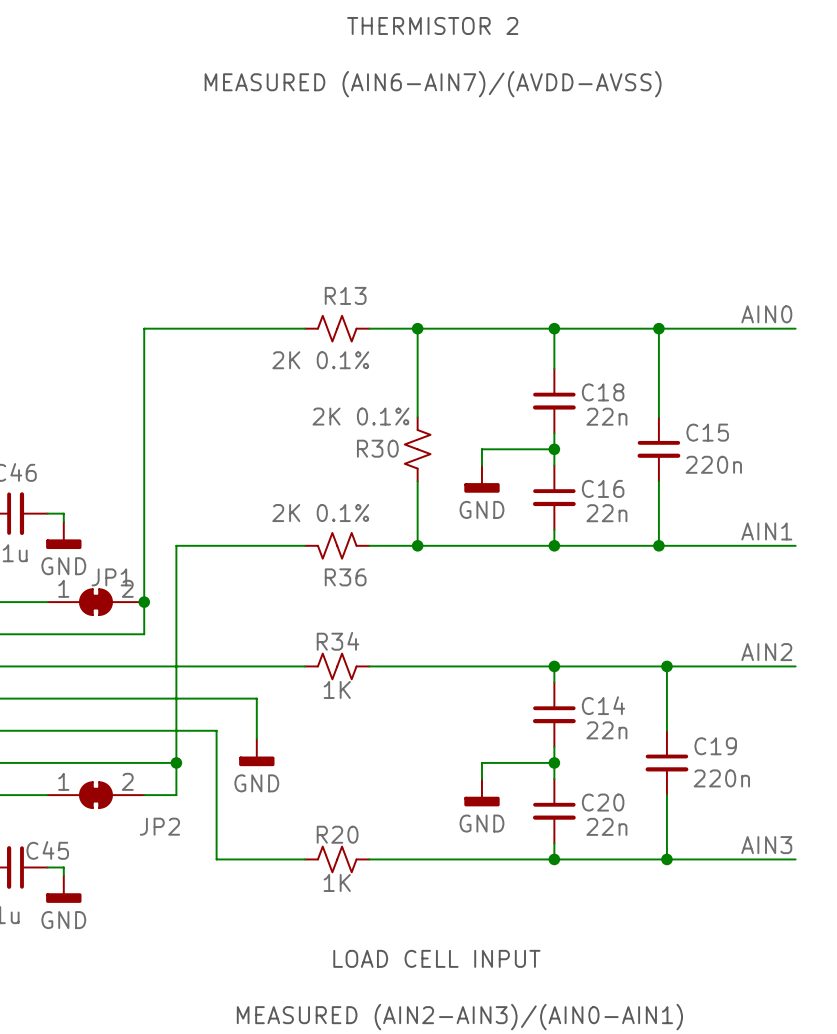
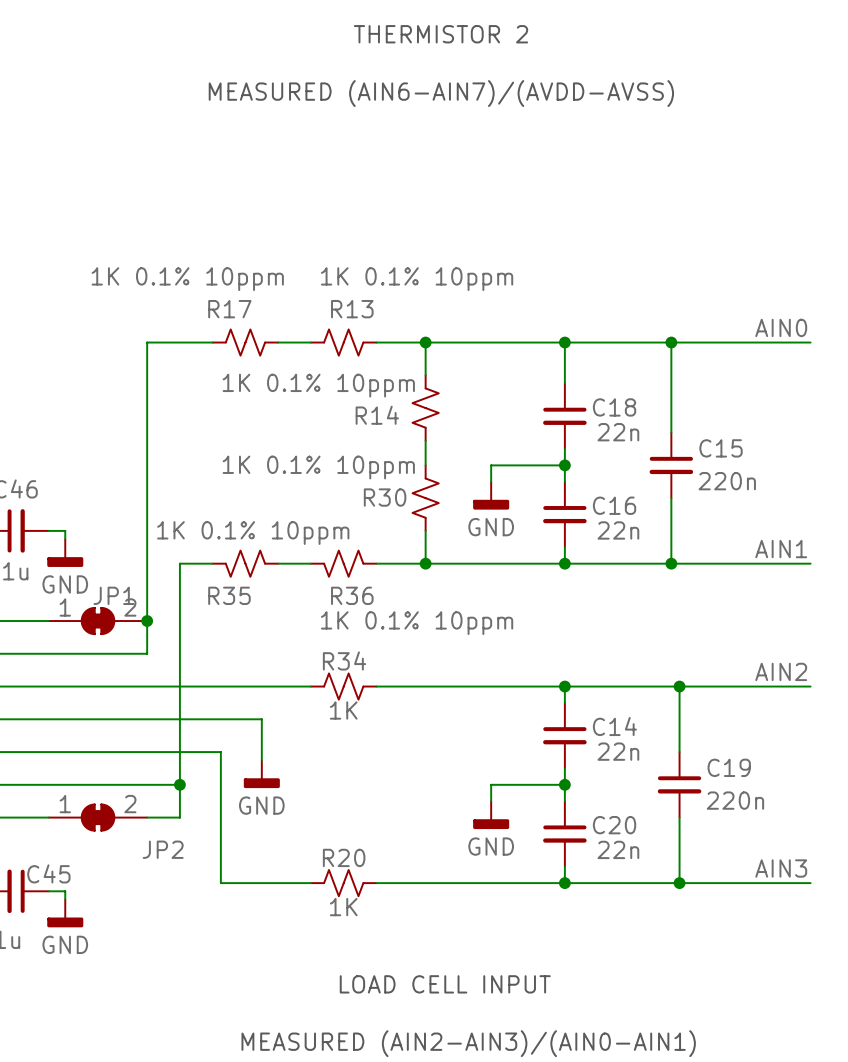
R17: none -> 1K 0.1% 10ppm (245, 342)
R13 value: 2K 0.1% (320, 360) -> 1K 0.1% 10ppm (417, 279)
wire: (417, 360) (417, 417) -> none
R14: none -> 1K 0.1% 10ppm (425, 408)
R30 value: 2K 0.1% (360, 416) -> 1K 0.1% 10ppm (318, 467)
wire: none -> (425, 440) (425, 465)
R30 position: (417, 449) -> (425, 498)
R36 value: 2K 0.1% (320, 513) -> 1K 0.1% 10ppm (417, 623)
R35: none -> 1K 0.1% 10ppm (245, 563)

